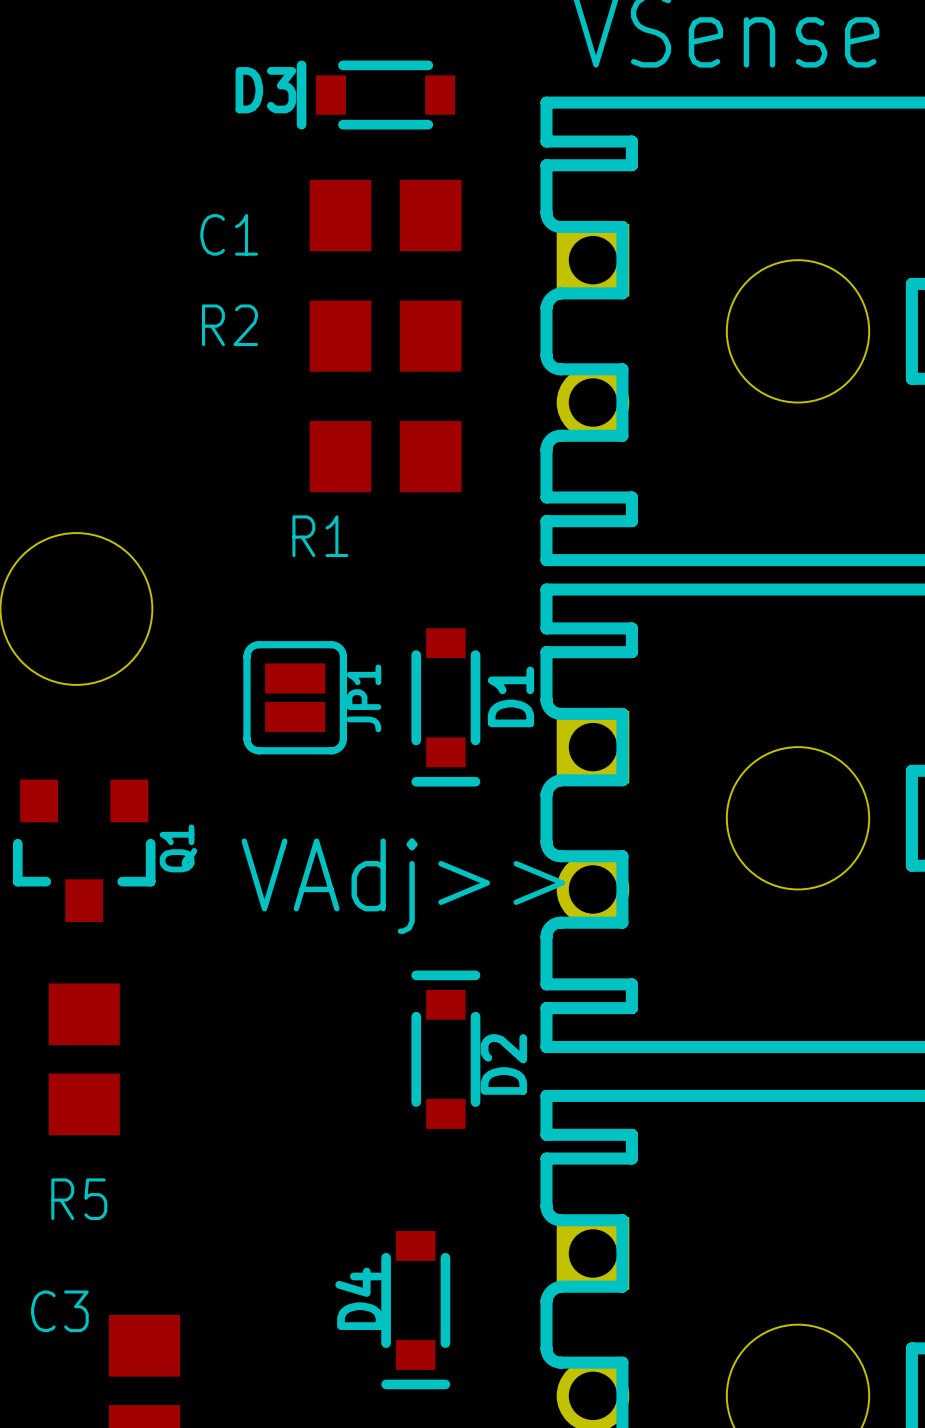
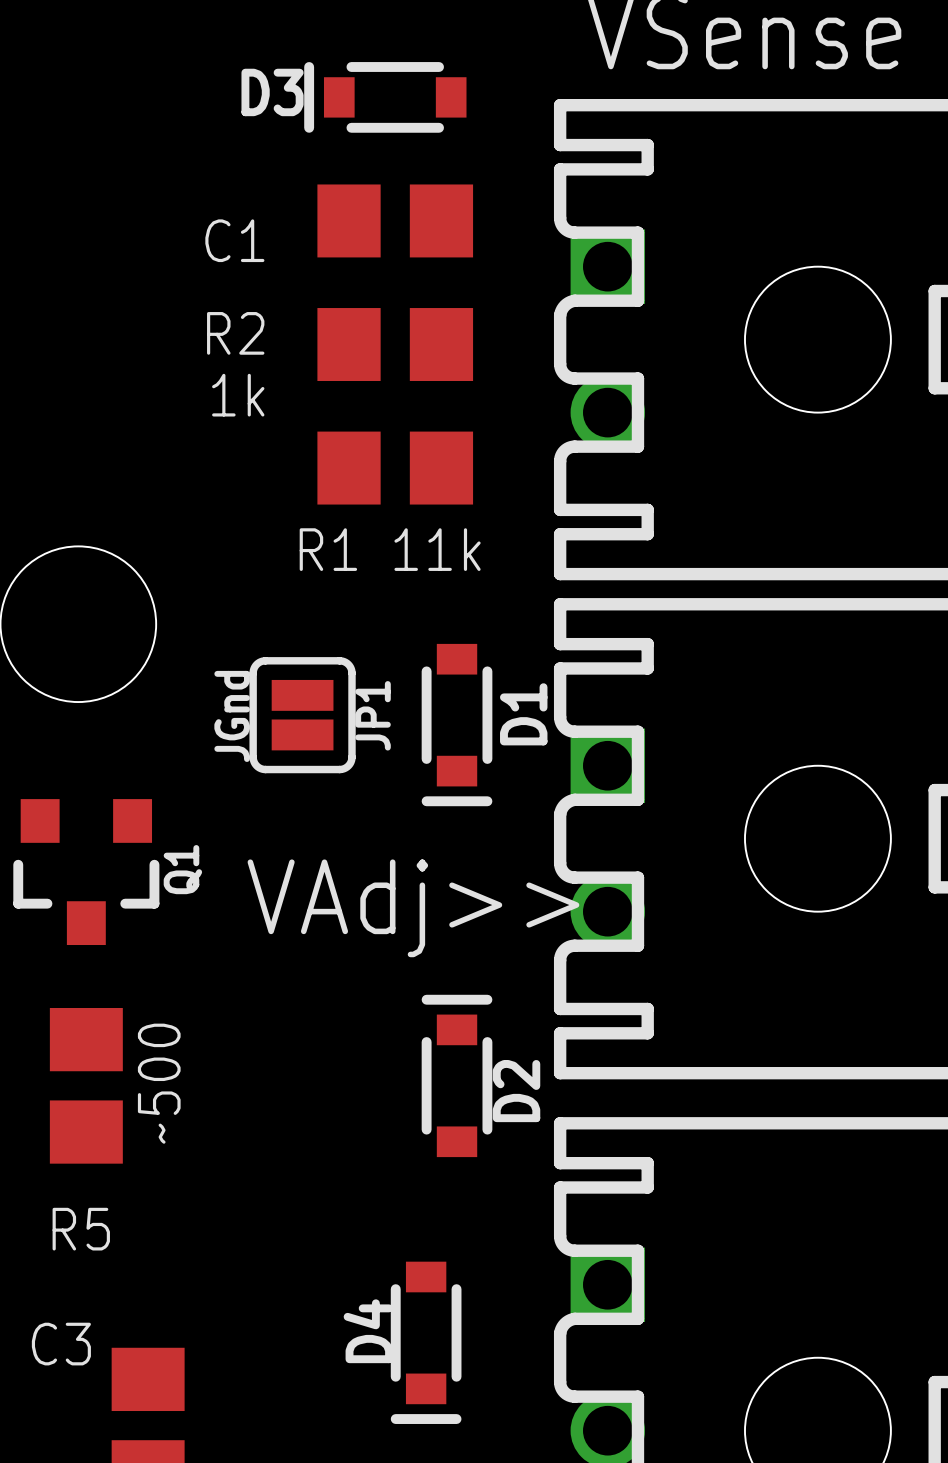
R2 value: none -> 1k (238, 395)
R1 value: none -> 11k (437, 549)
JP1 value: none -> JGnd (232, 716)
R5 value: none -> ~500 (159, 1083)

